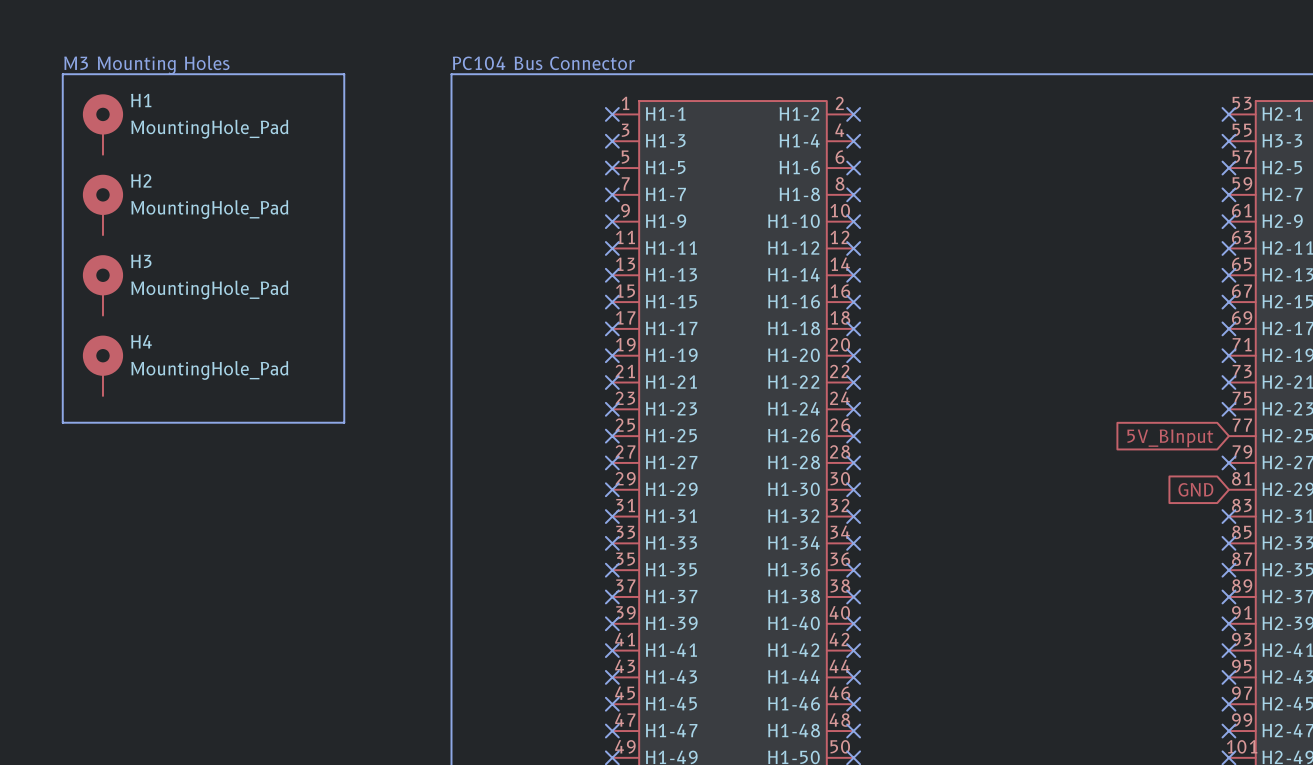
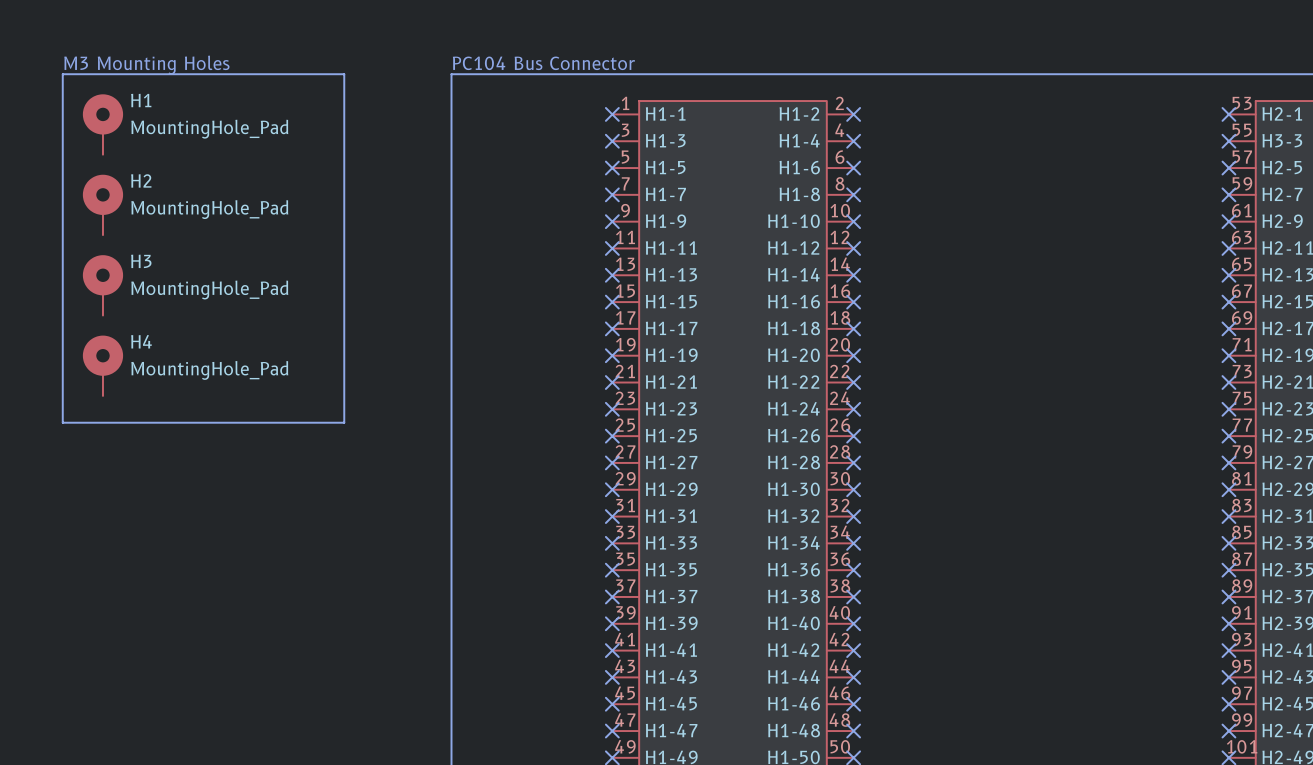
no-connect mark: none -> (1228, 436)
global label: 5V_BInput (1170, 438) -> none
global label: GND (1195, 489) -> none
no-connect mark: none -> (1228, 489)

